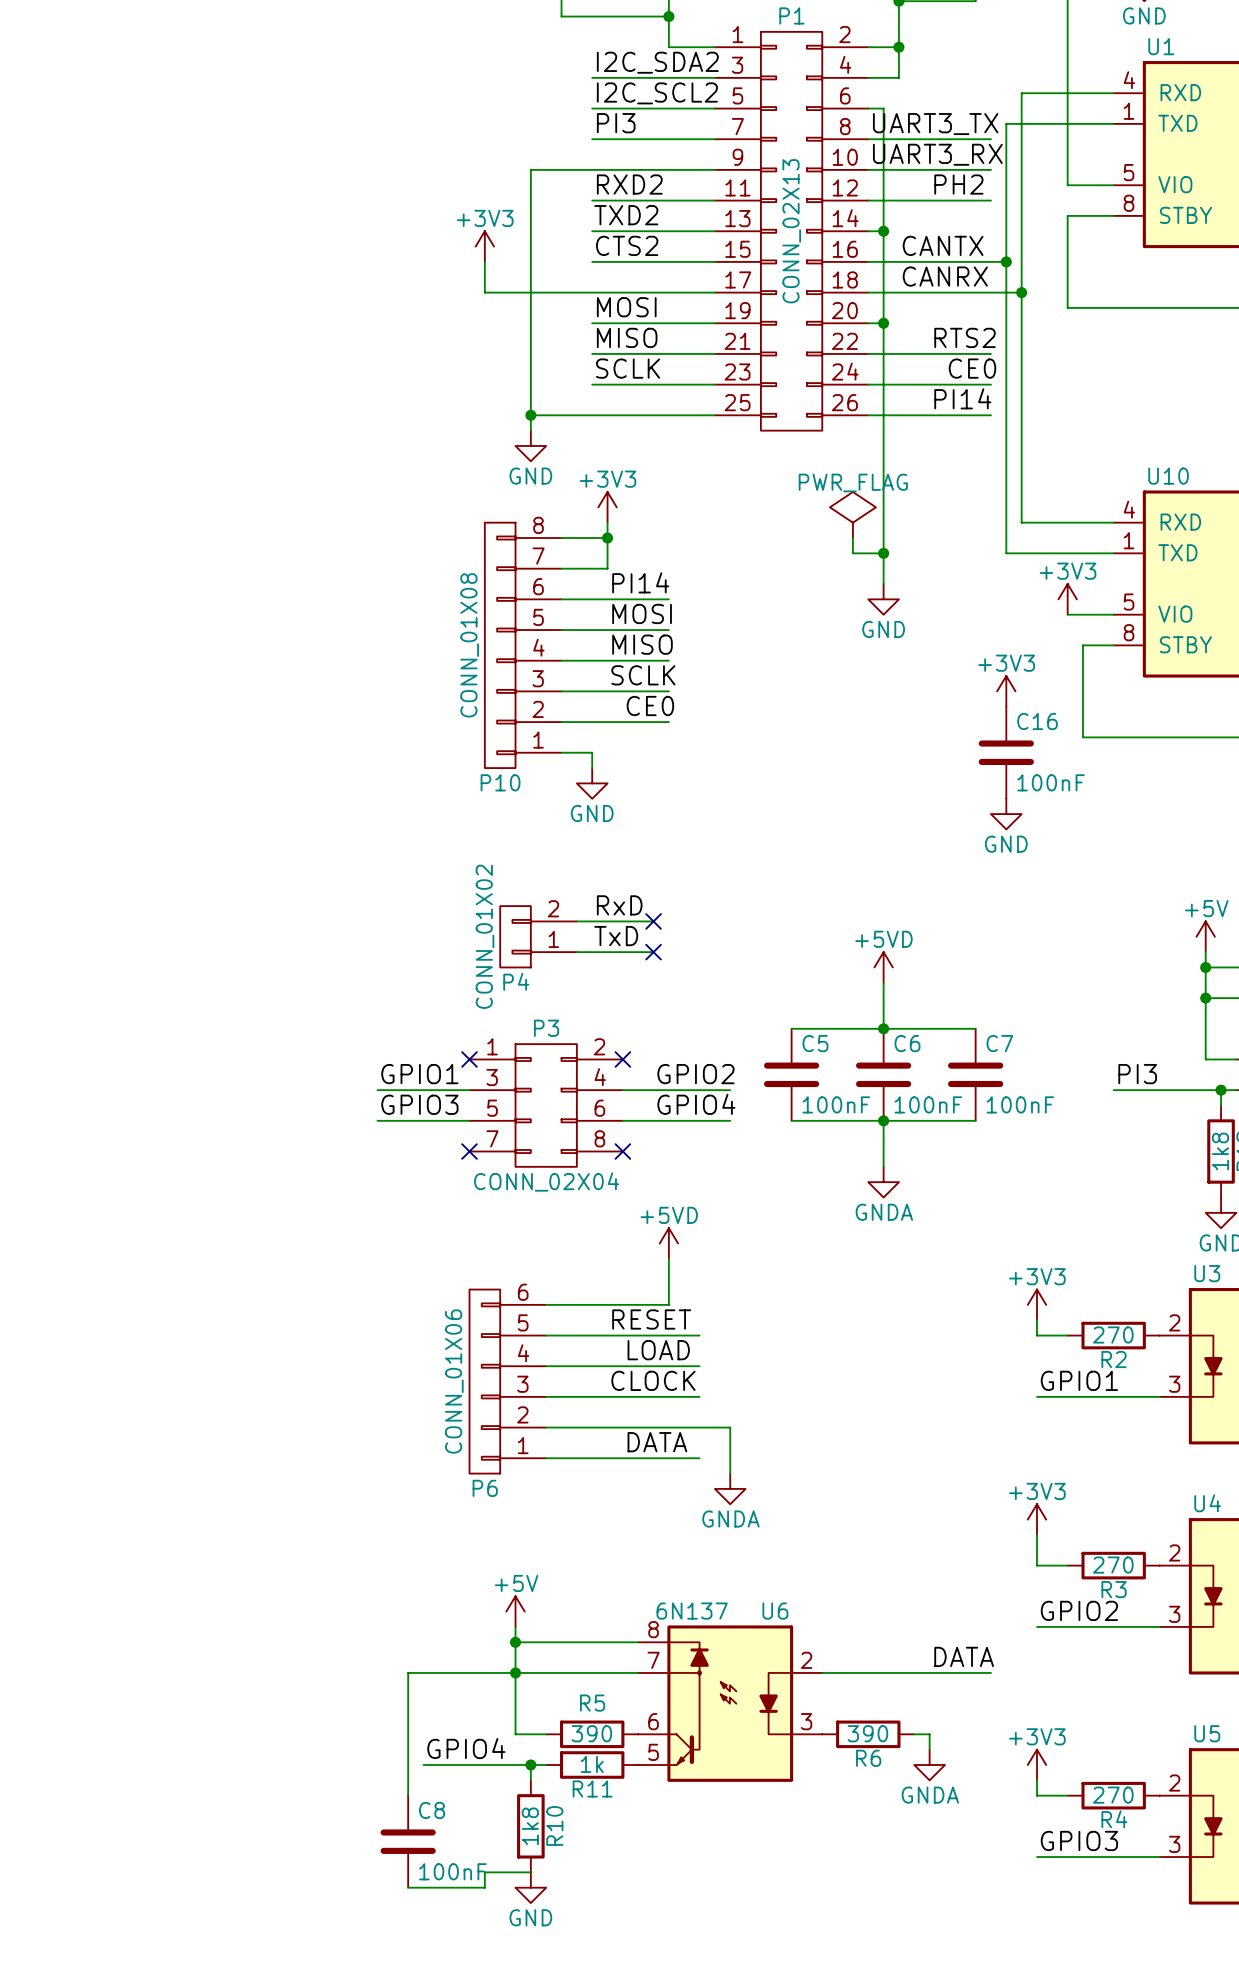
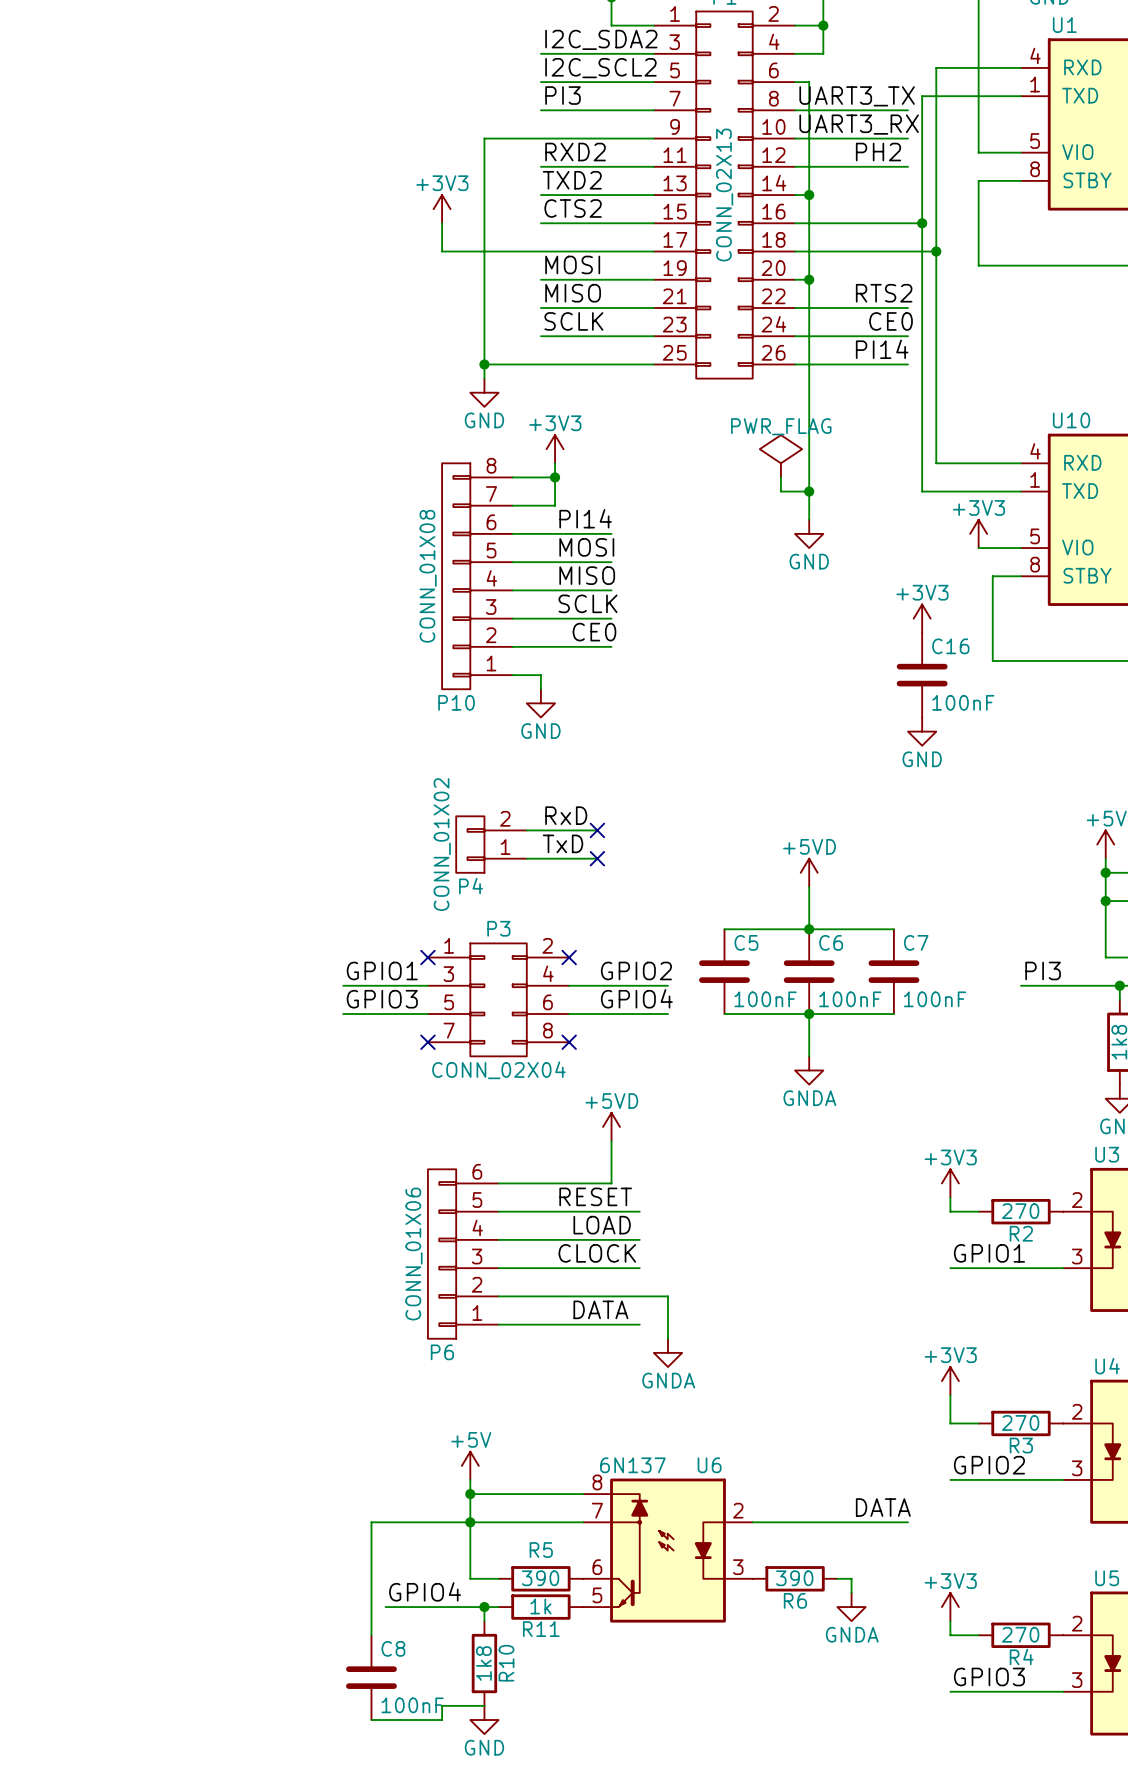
label: CANTX (943, 245) -> none
label: CANRX (945, 276) -> none

